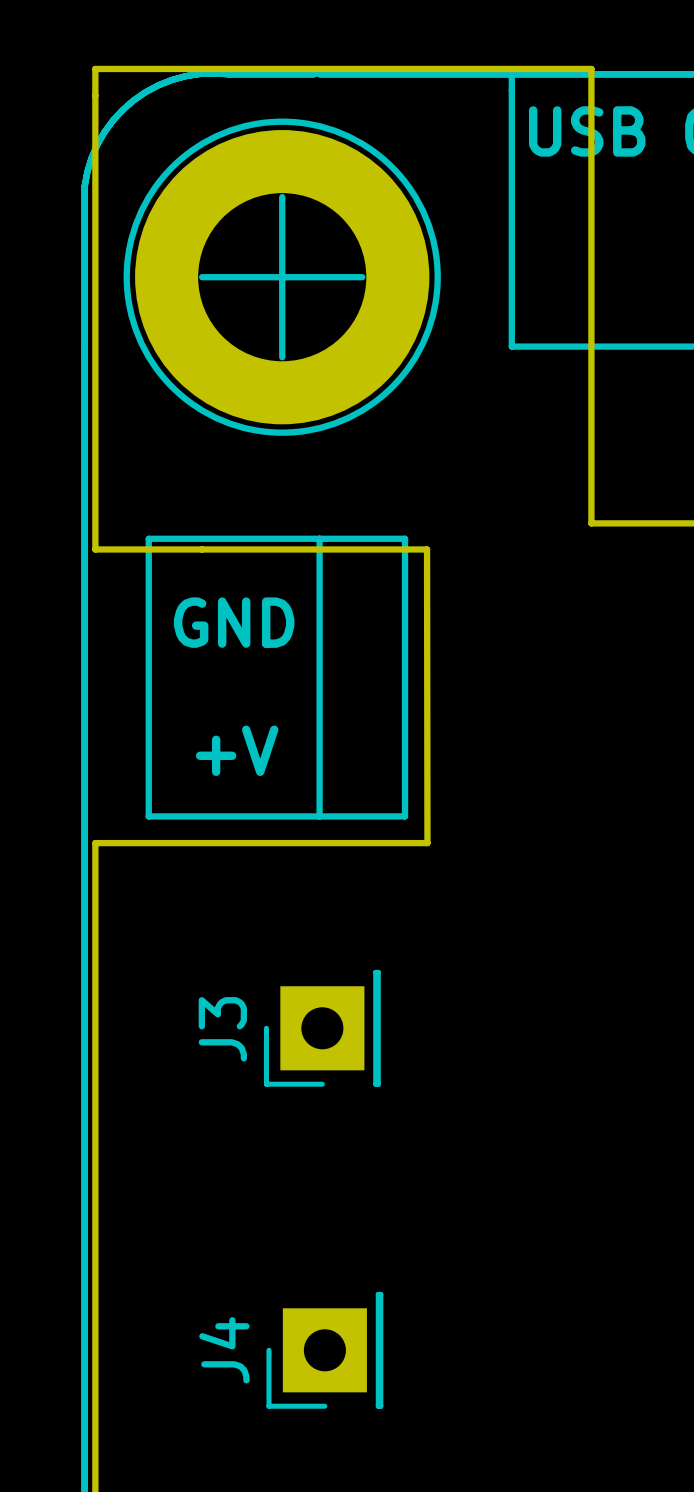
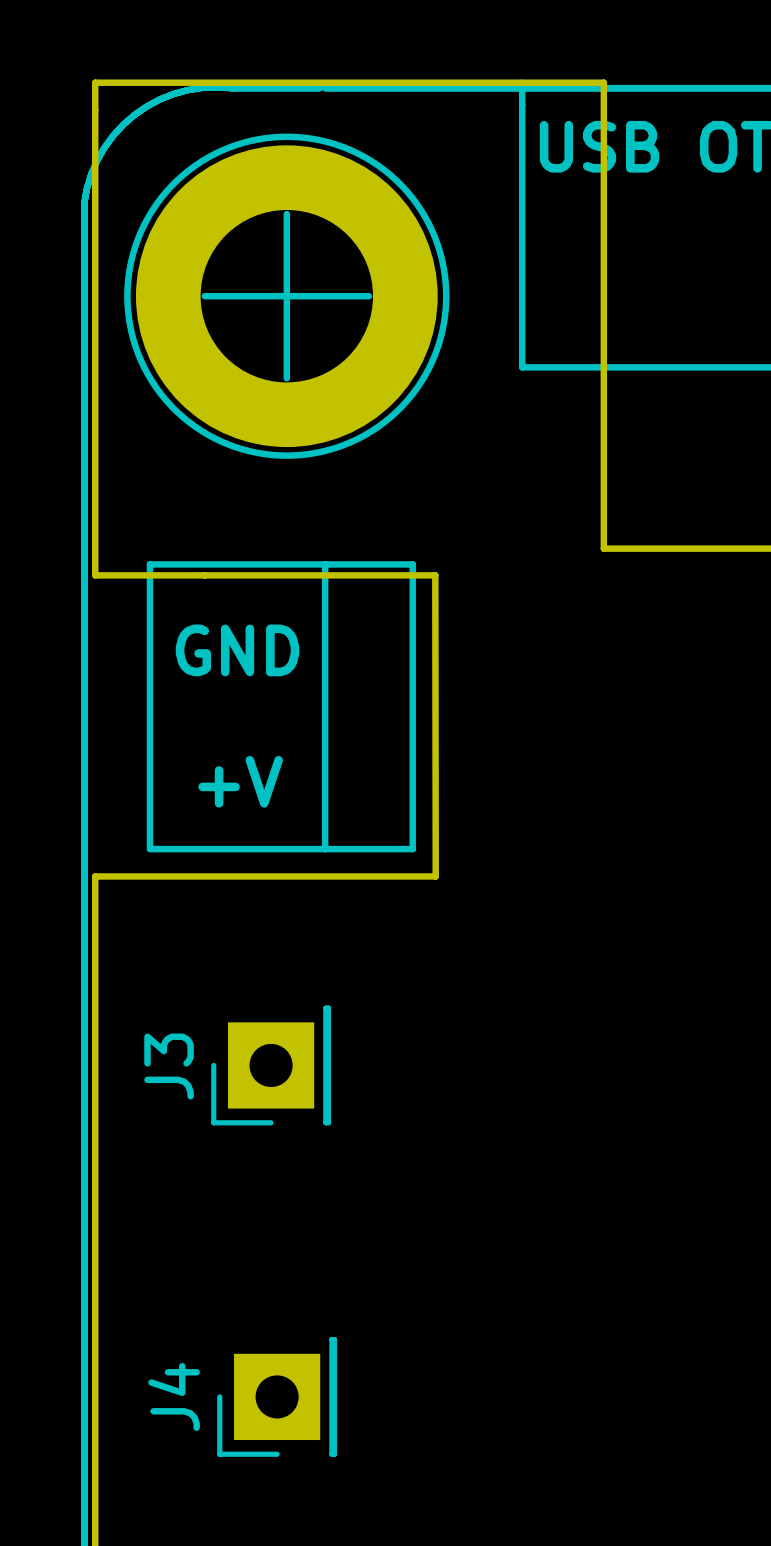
J3 position: (322, 1028) -> (271, 1065)
J4 position: (324, 1350) -> (277, 1396)

